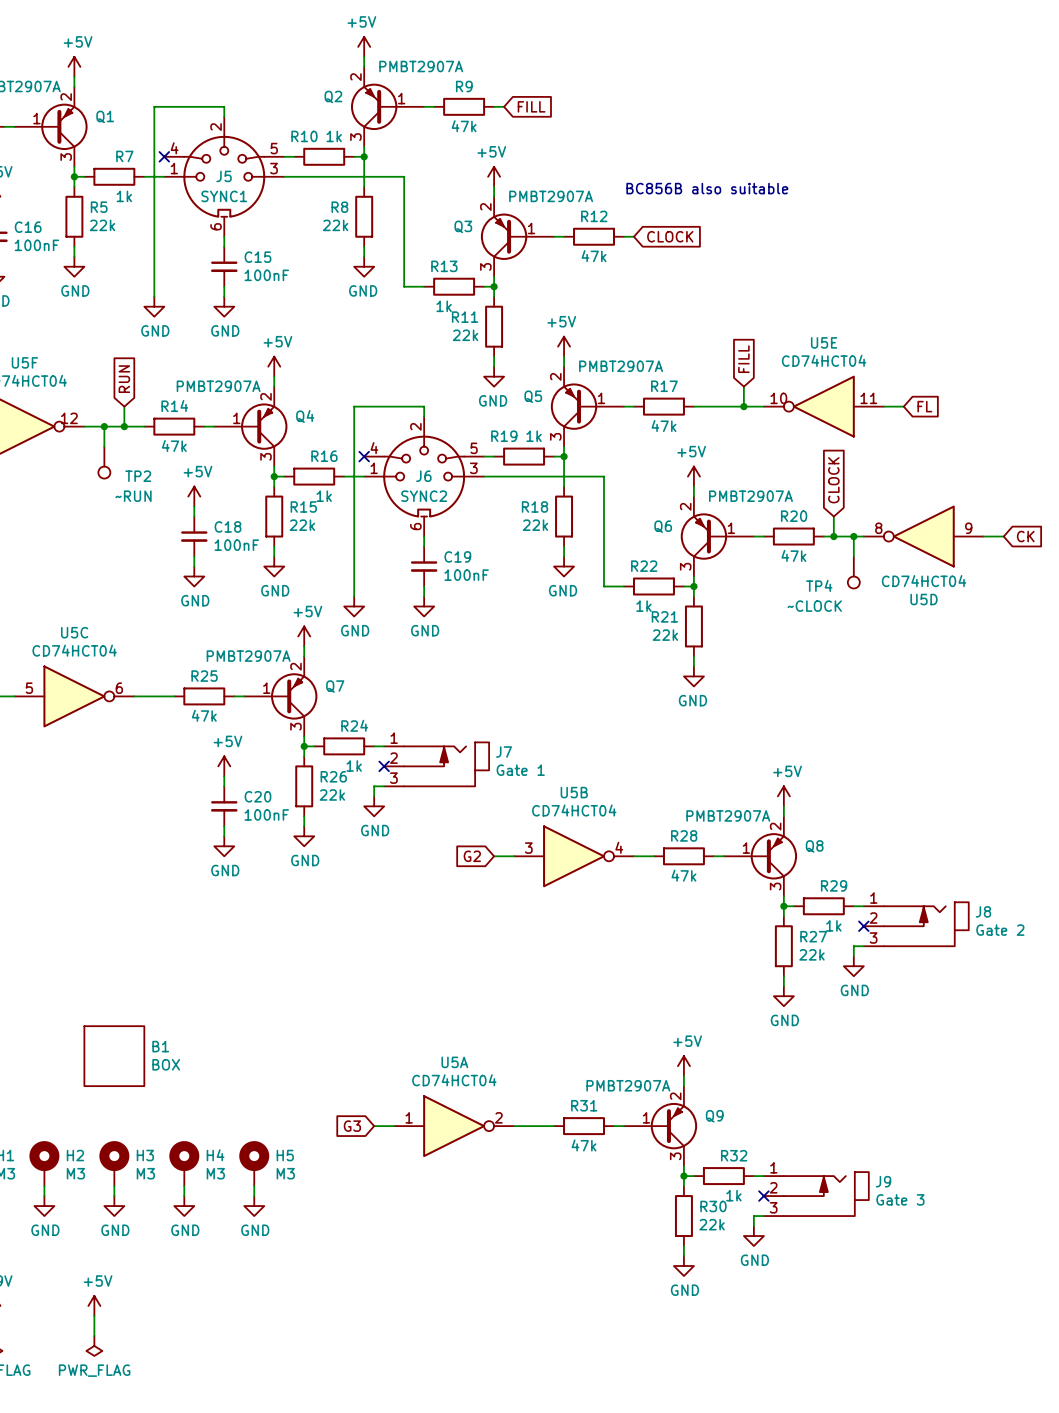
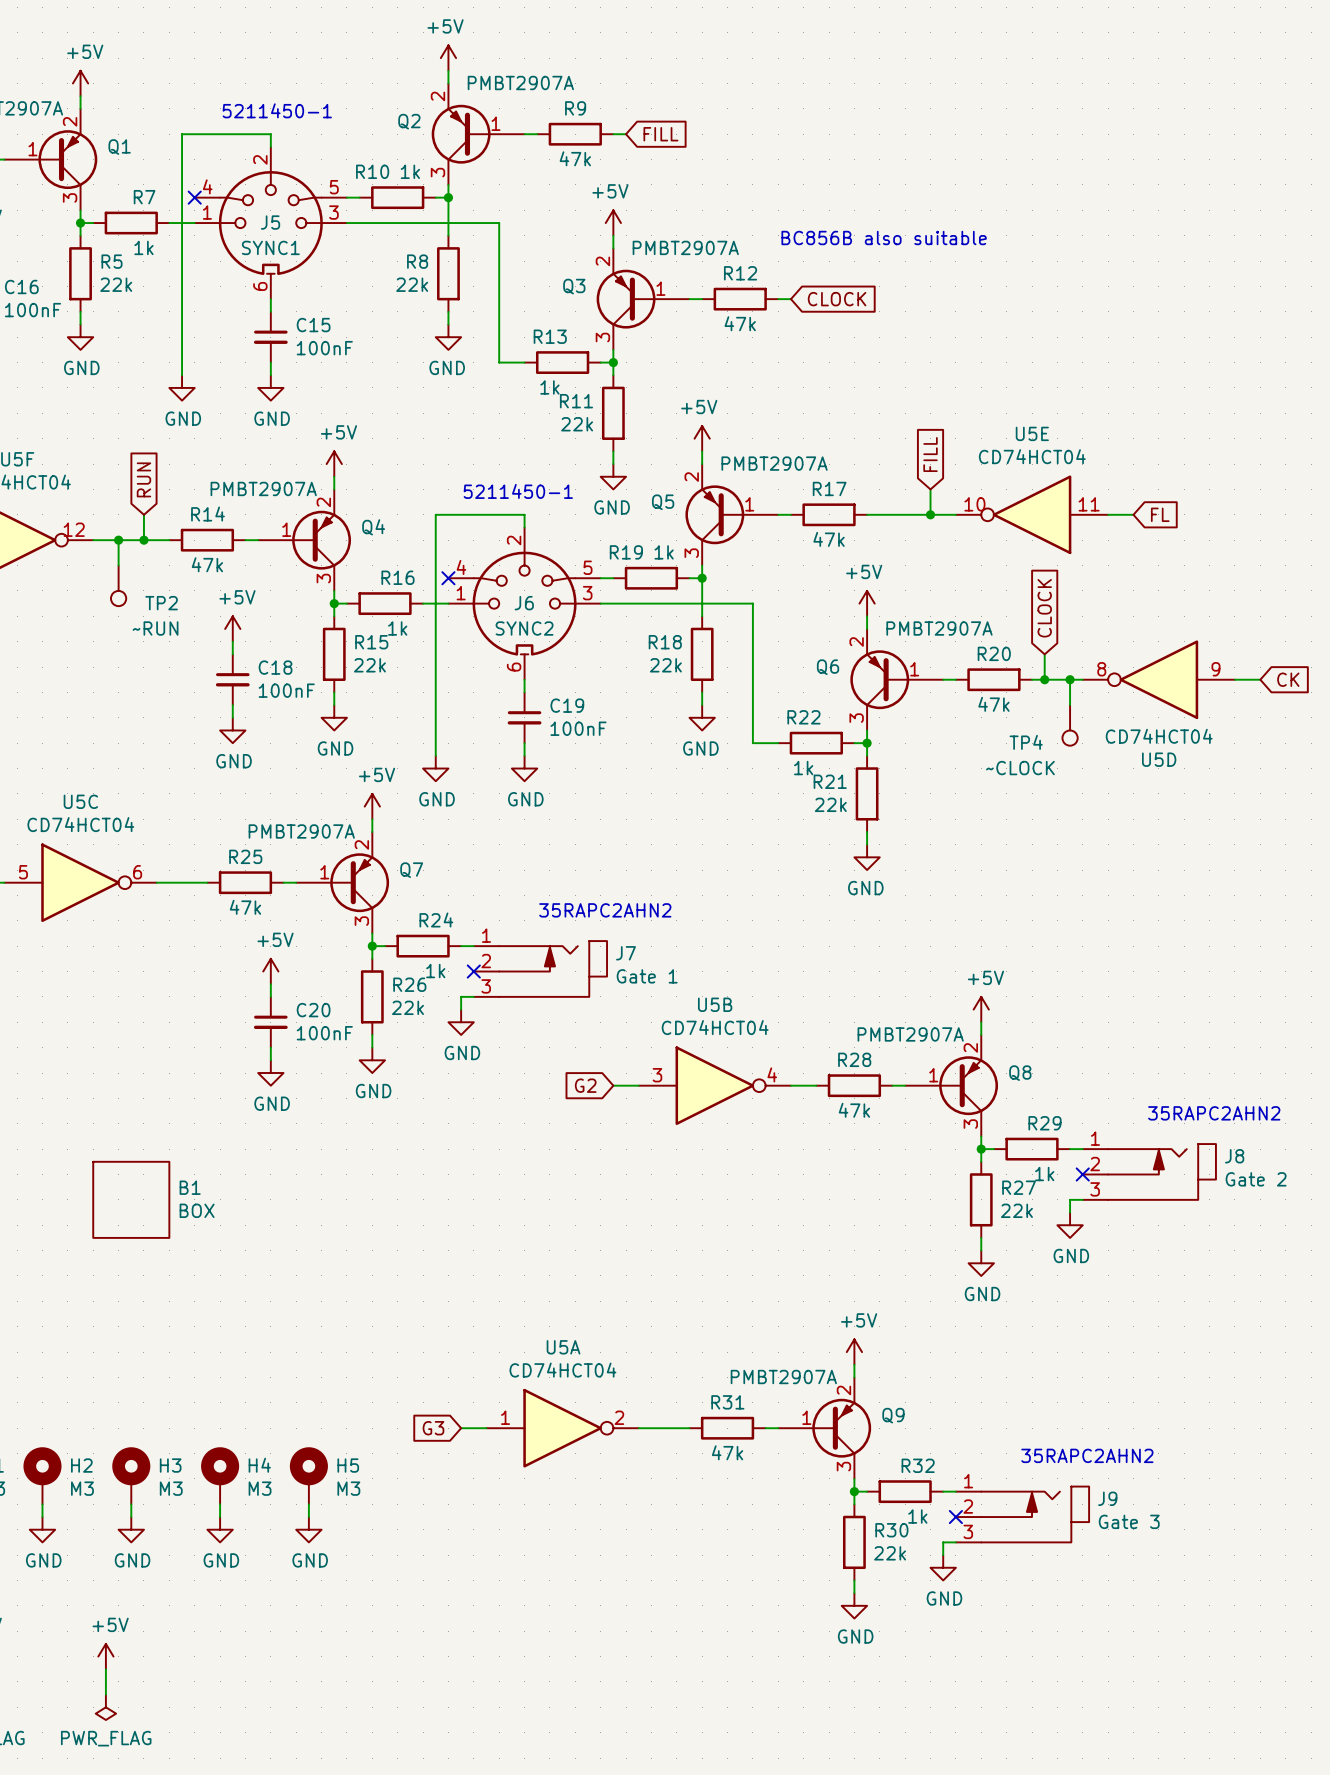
text: none -> 5211450-1 (277, 110)
text: none -> 5211450-1 (518, 491)
text: none -> 35RAPC2AHN2 (605, 910)
text: none -> 35RAPC2AHN2 (1214, 1113)
B1 position: (114, 1056) -> (131, 1199)
text: none -> 35RAPC2AHN2 (1087, 1455)

